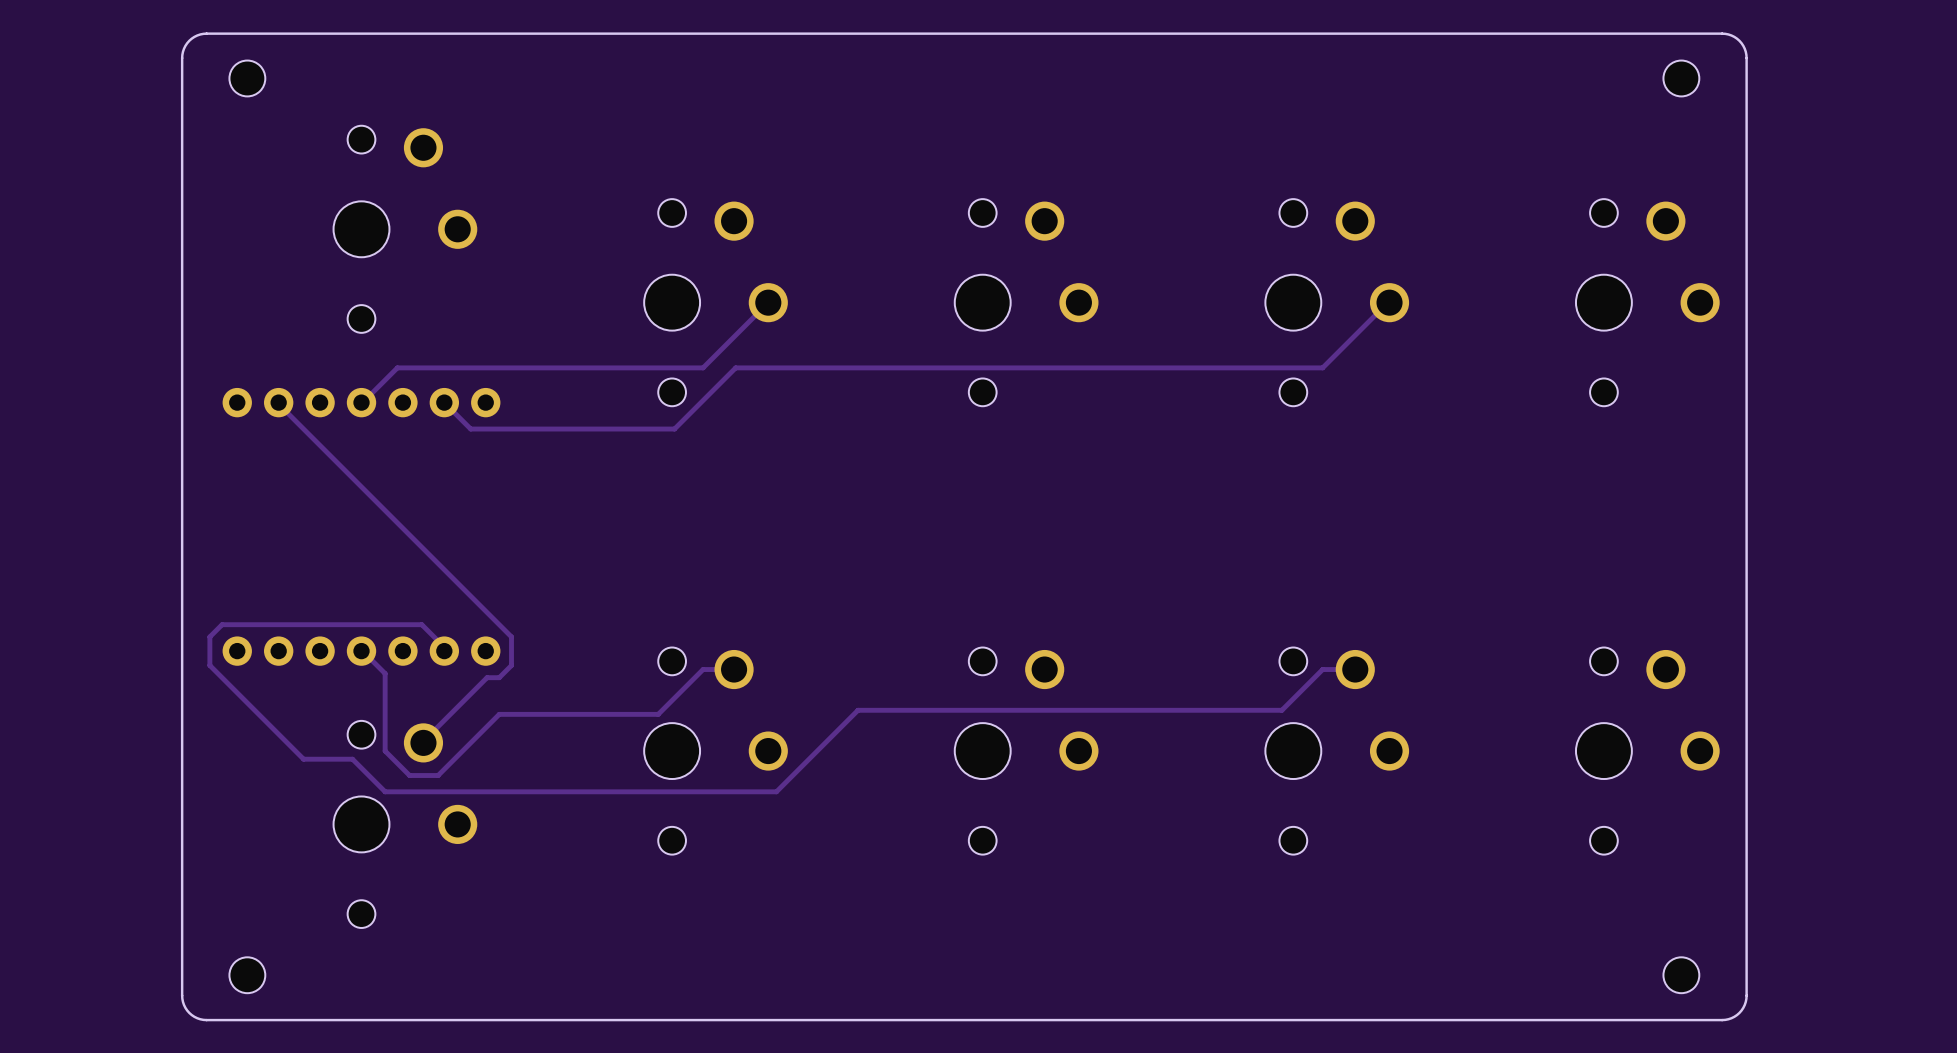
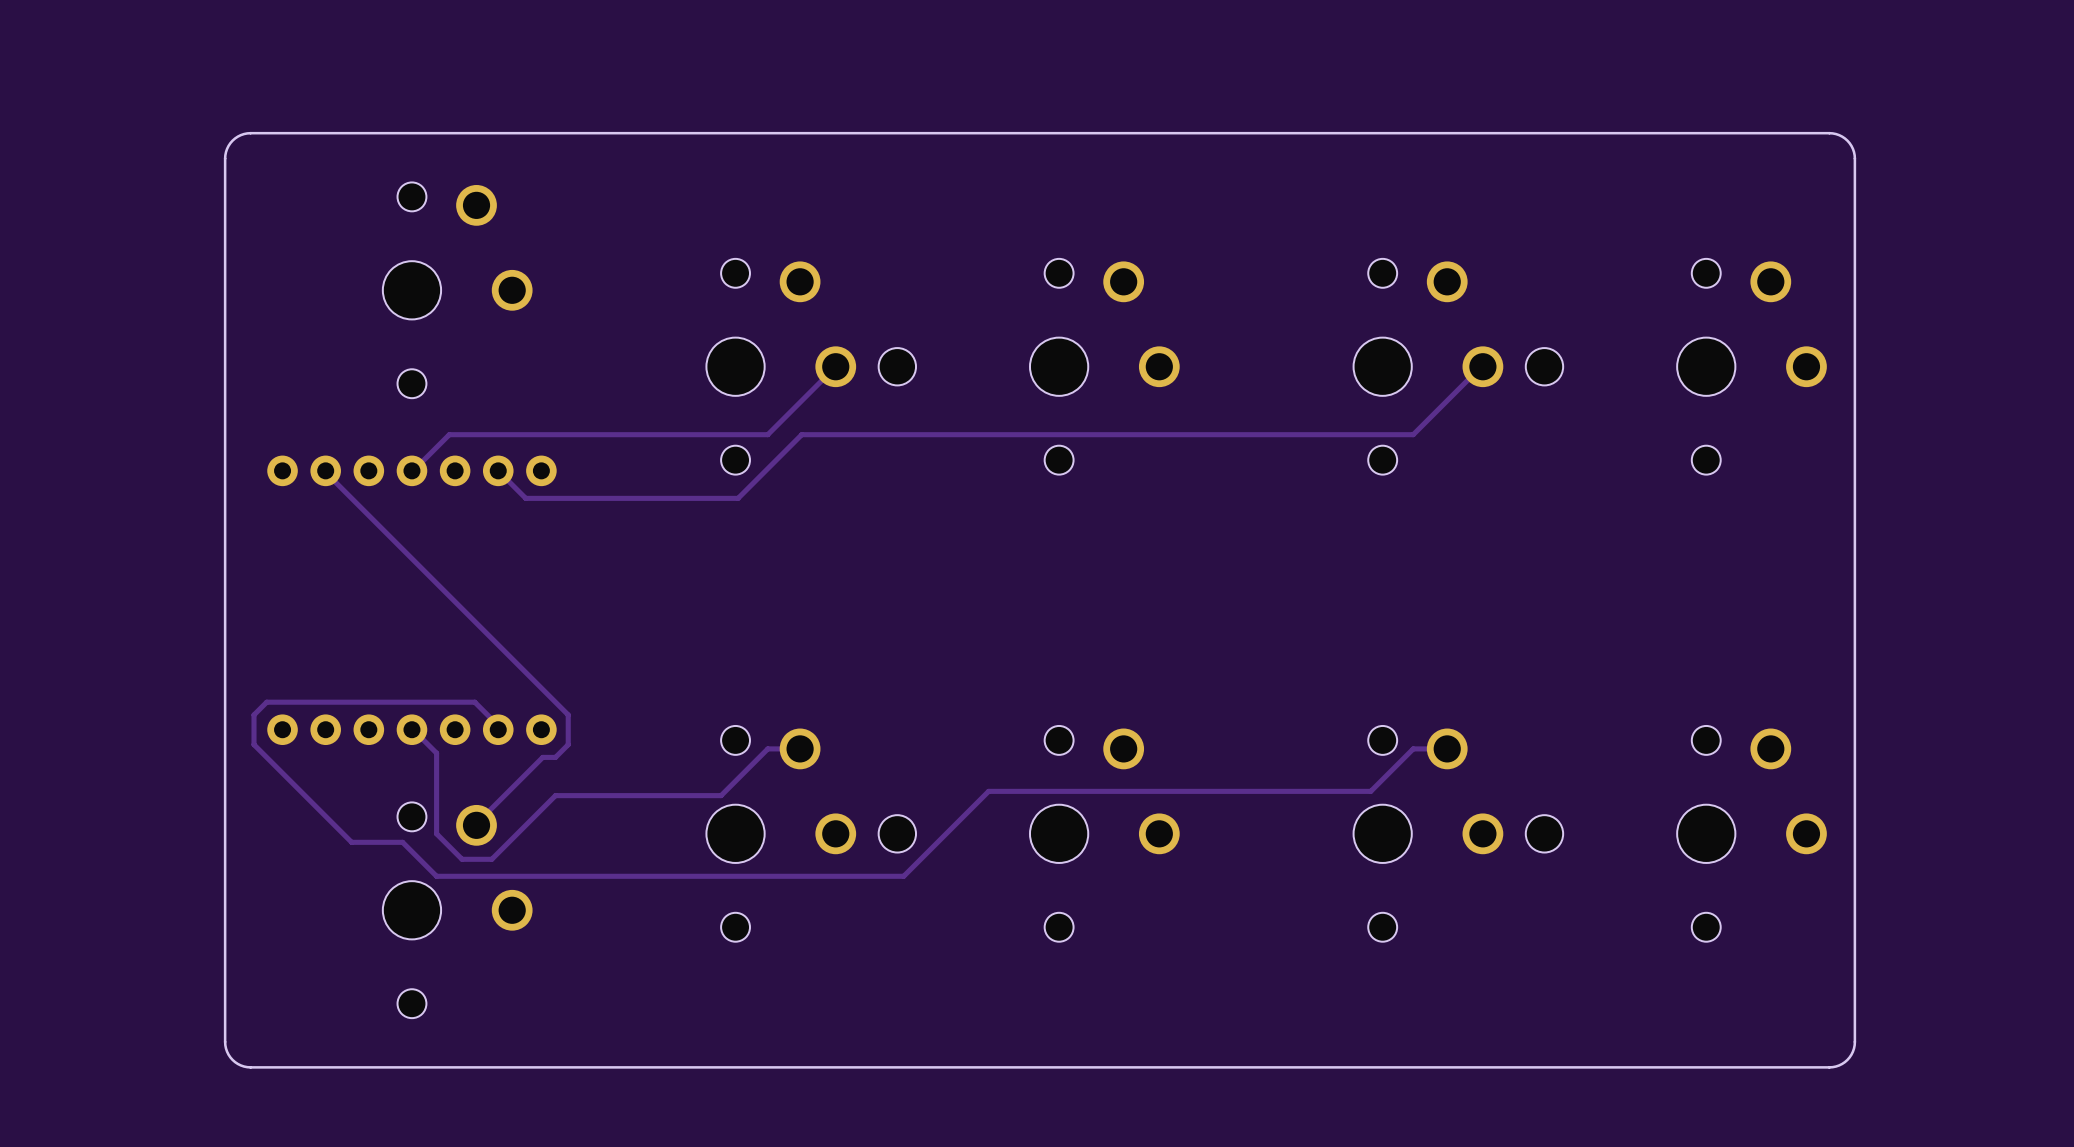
part: (247, 78) -> none
part position: (1681, 78) -> (1544, 366)
board edge: (1746, 102) (1746, 58) (1744, 48) (1734, 36) (1722, 33) (206, 33) (194, 36) (184, 48) (182, 58) (182, 102) -> (1854, 158) (1852, 148) (1847, 140) (1839, 135) (1829, 133) (250, 133) (240, 135) (232, 140) (227, 148) (225, 158)
part: none -> (897, 366)
track: (915, 710) (857, 710) (776, 791) -> (988, 791) (903, 876) (844, 876)
part: none -> (897, 833)
board edge: (1746, 950) (1746, 995) (1744, 1004) (1734, 1016) (1722, 1020) (206, 1020) (194, 1016) (184, 1004) (182, 995) (182, 950) -> (1854, 1041) (1852, 1051) (1847, 1059) (1839, 1065) (1829, 1067) (250, 1067) (240, 1065) (232, 1059) (227, 1051) (225, 1041)
part: (247, 975) -> none
part position: (1681, 975) -> (1544, 833)

